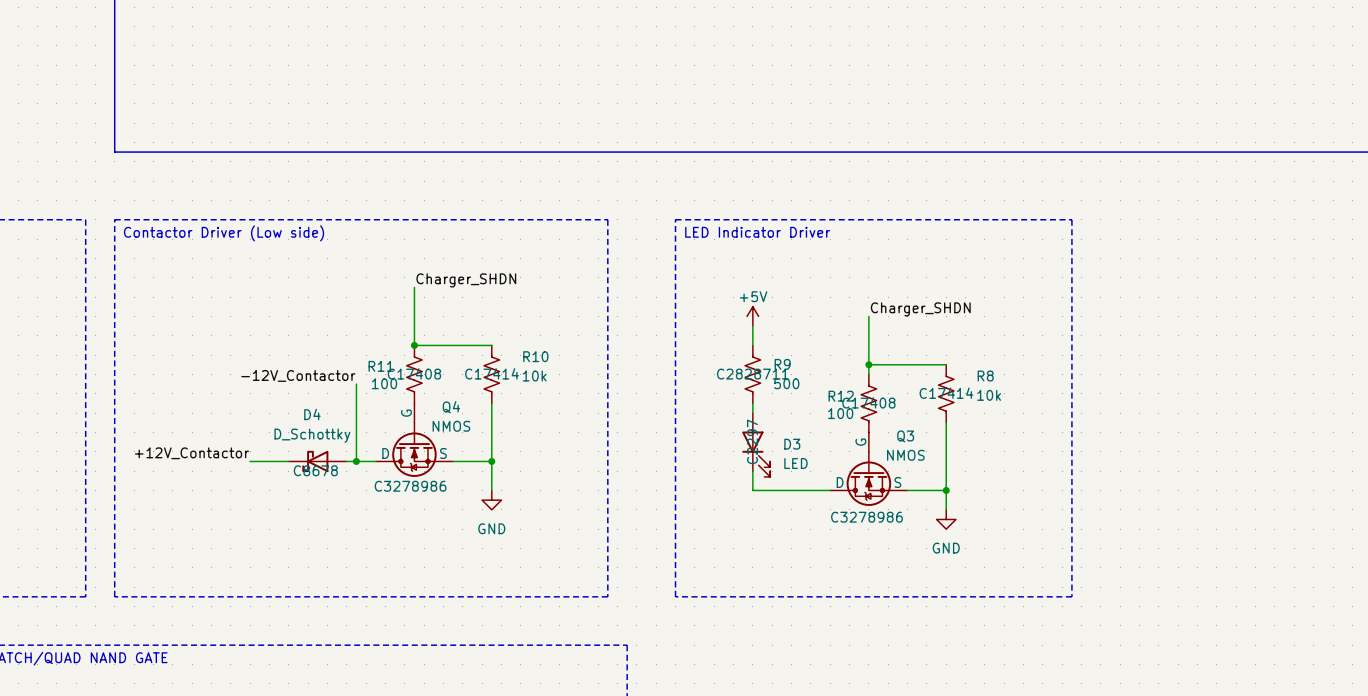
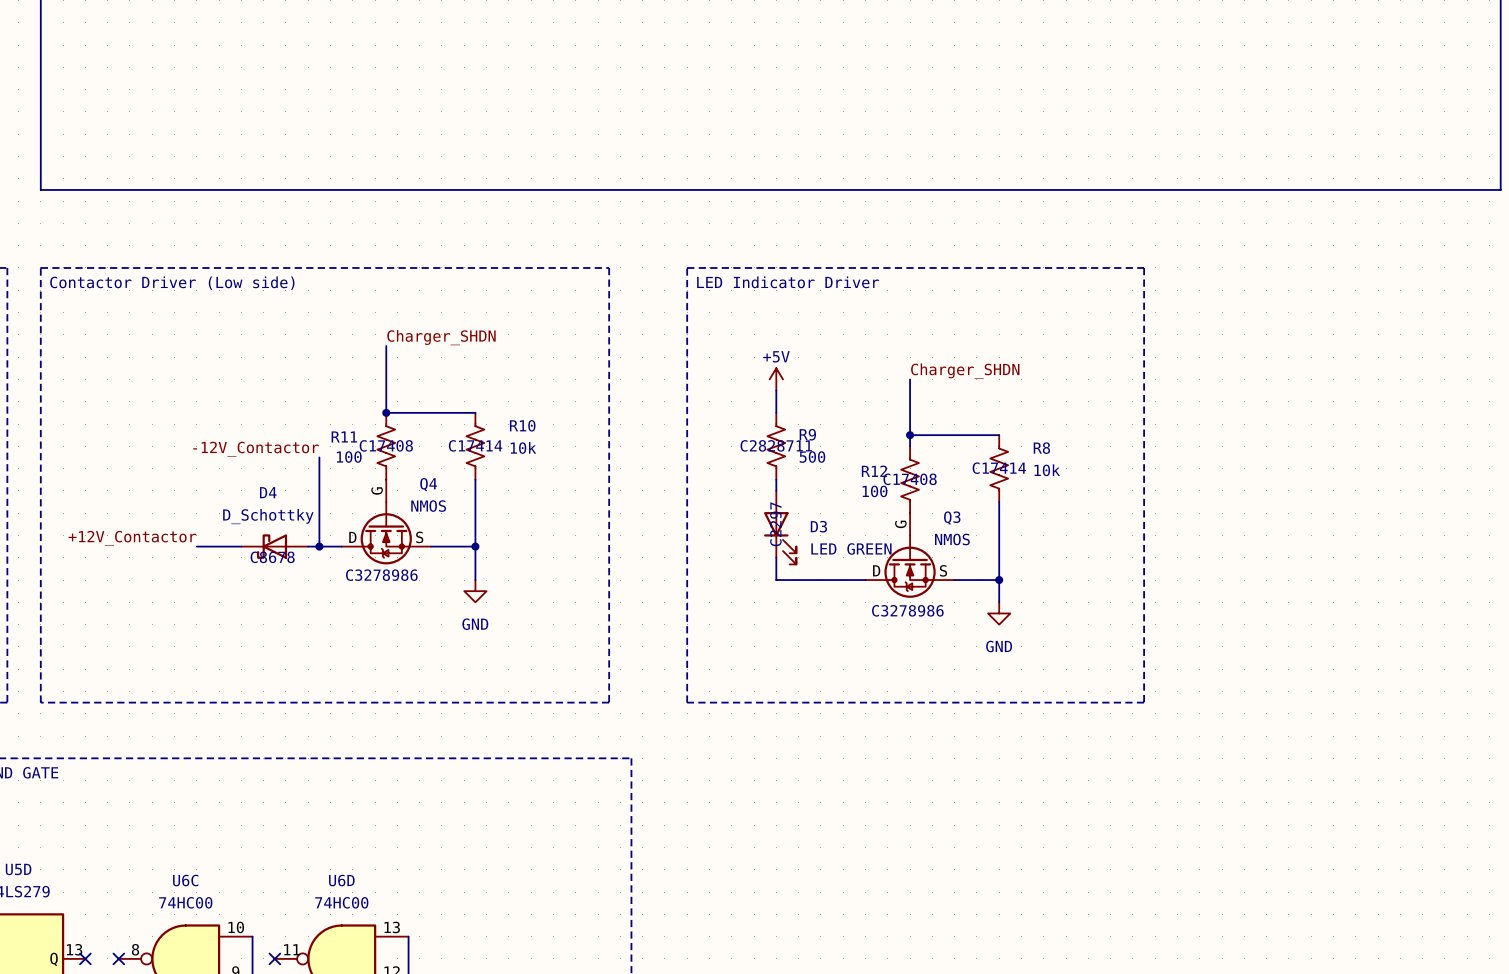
D3 value: LED (795, 463) -> LED GREEN (851, 548)

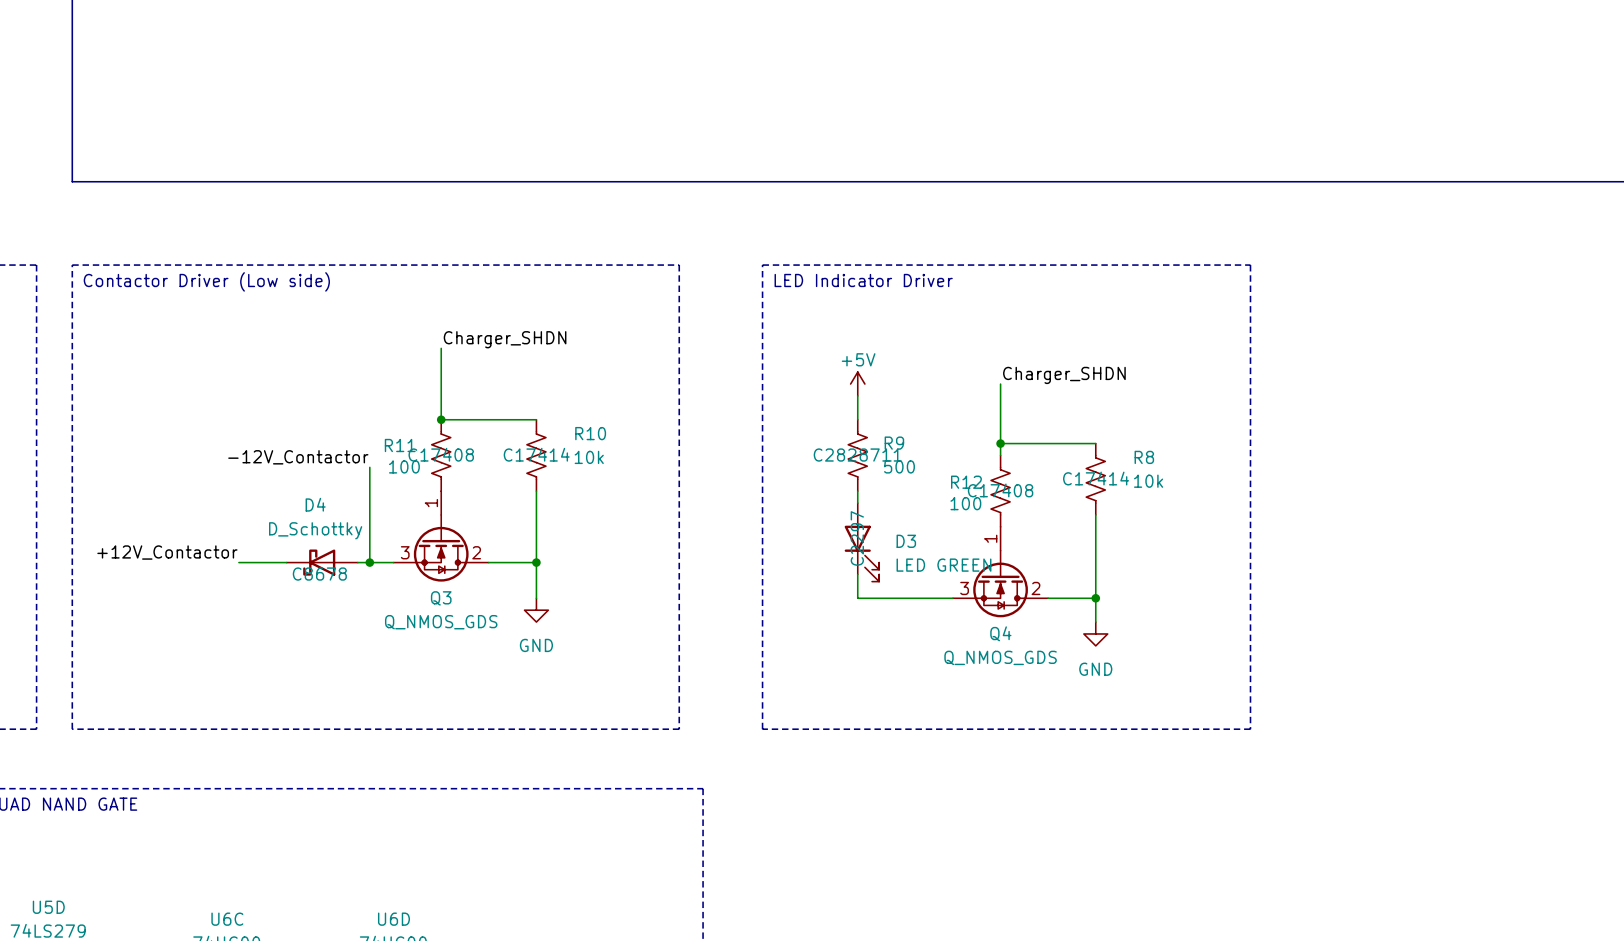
Q4 symbol: [341, 479, 431, 565] -> [952, 526, 1049, 618]
Q4 name position: Q4 (428, 484) -> Q4 (1000, 633)
Q4 value: NMOS (428, 506) -> Q_NMOS_GDS (1000, 657)
Q3 symbol: [865, 513, 955, 598] -> [393, 491, 489, 582]
Q3 name position: Q3 (952, 518) -> Q3 (441, 598)
Q3 value: NMOS (952, 539) -> Q_NMOS_GDS (441, 622)
Q4 text: C3278986 (381, 575) -> none
Q3 text: C3278986 (907, 610) -> none

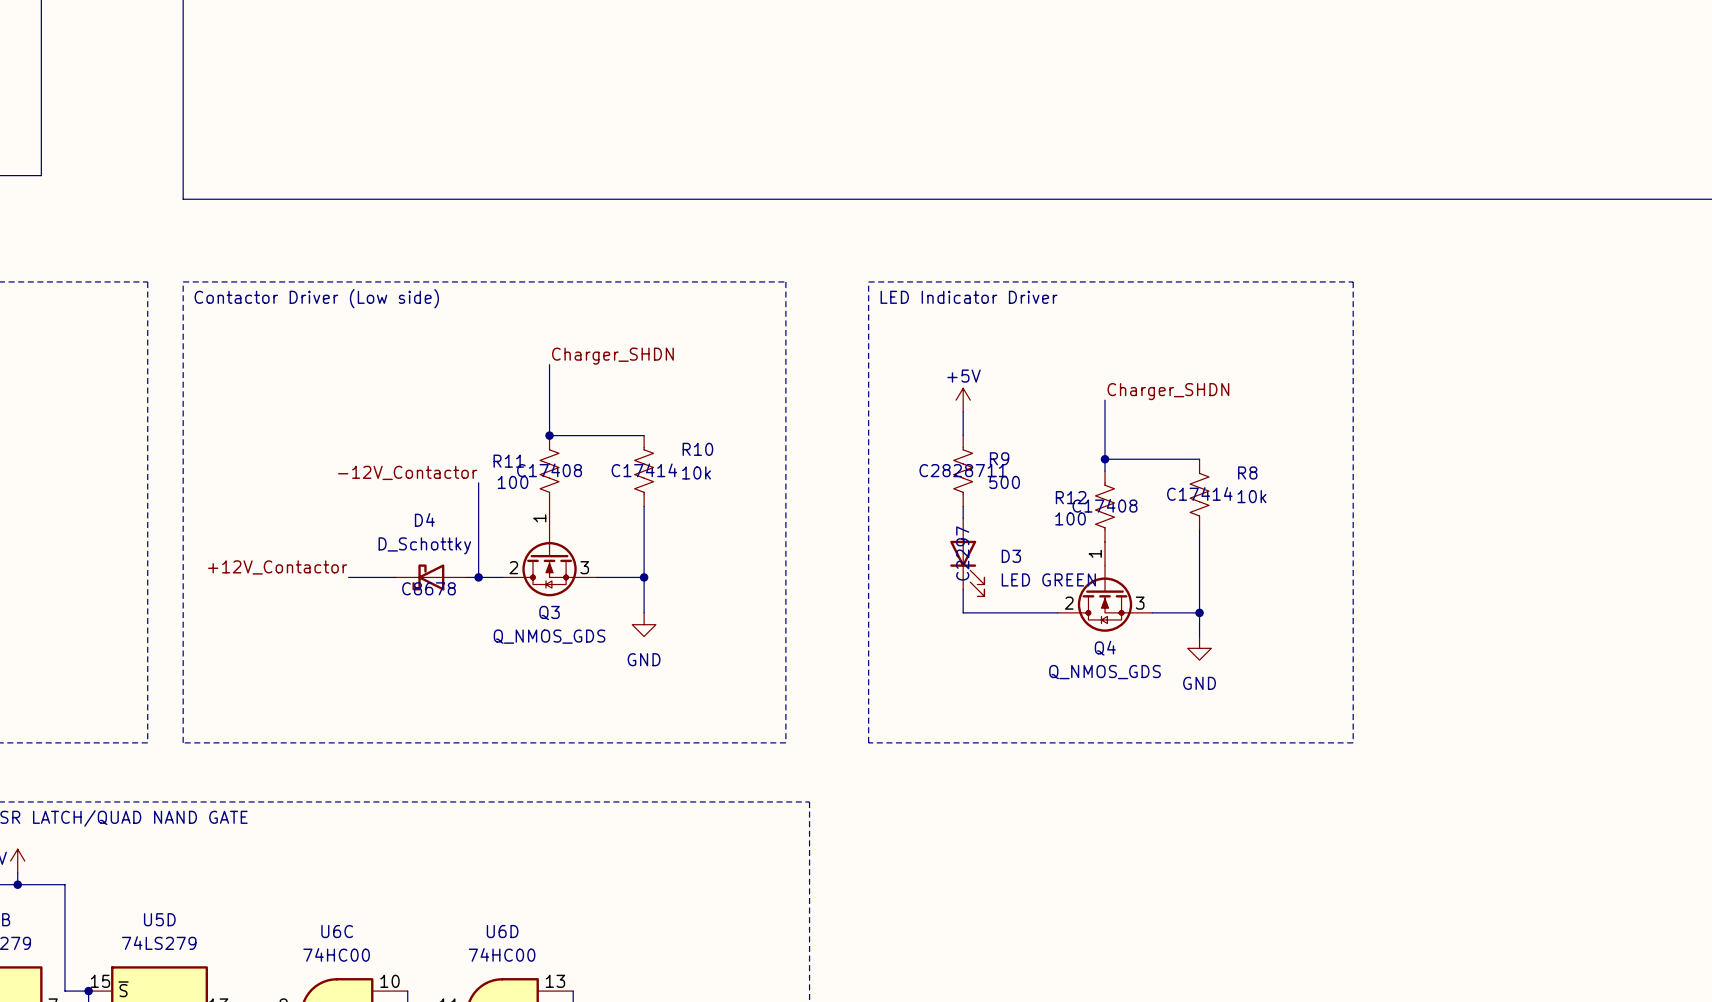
Q3 flip: as is (441, 548) -> left-right (549, 563)
Q4 flip: as is (1000, 584) -> left-right (1105, 598)

